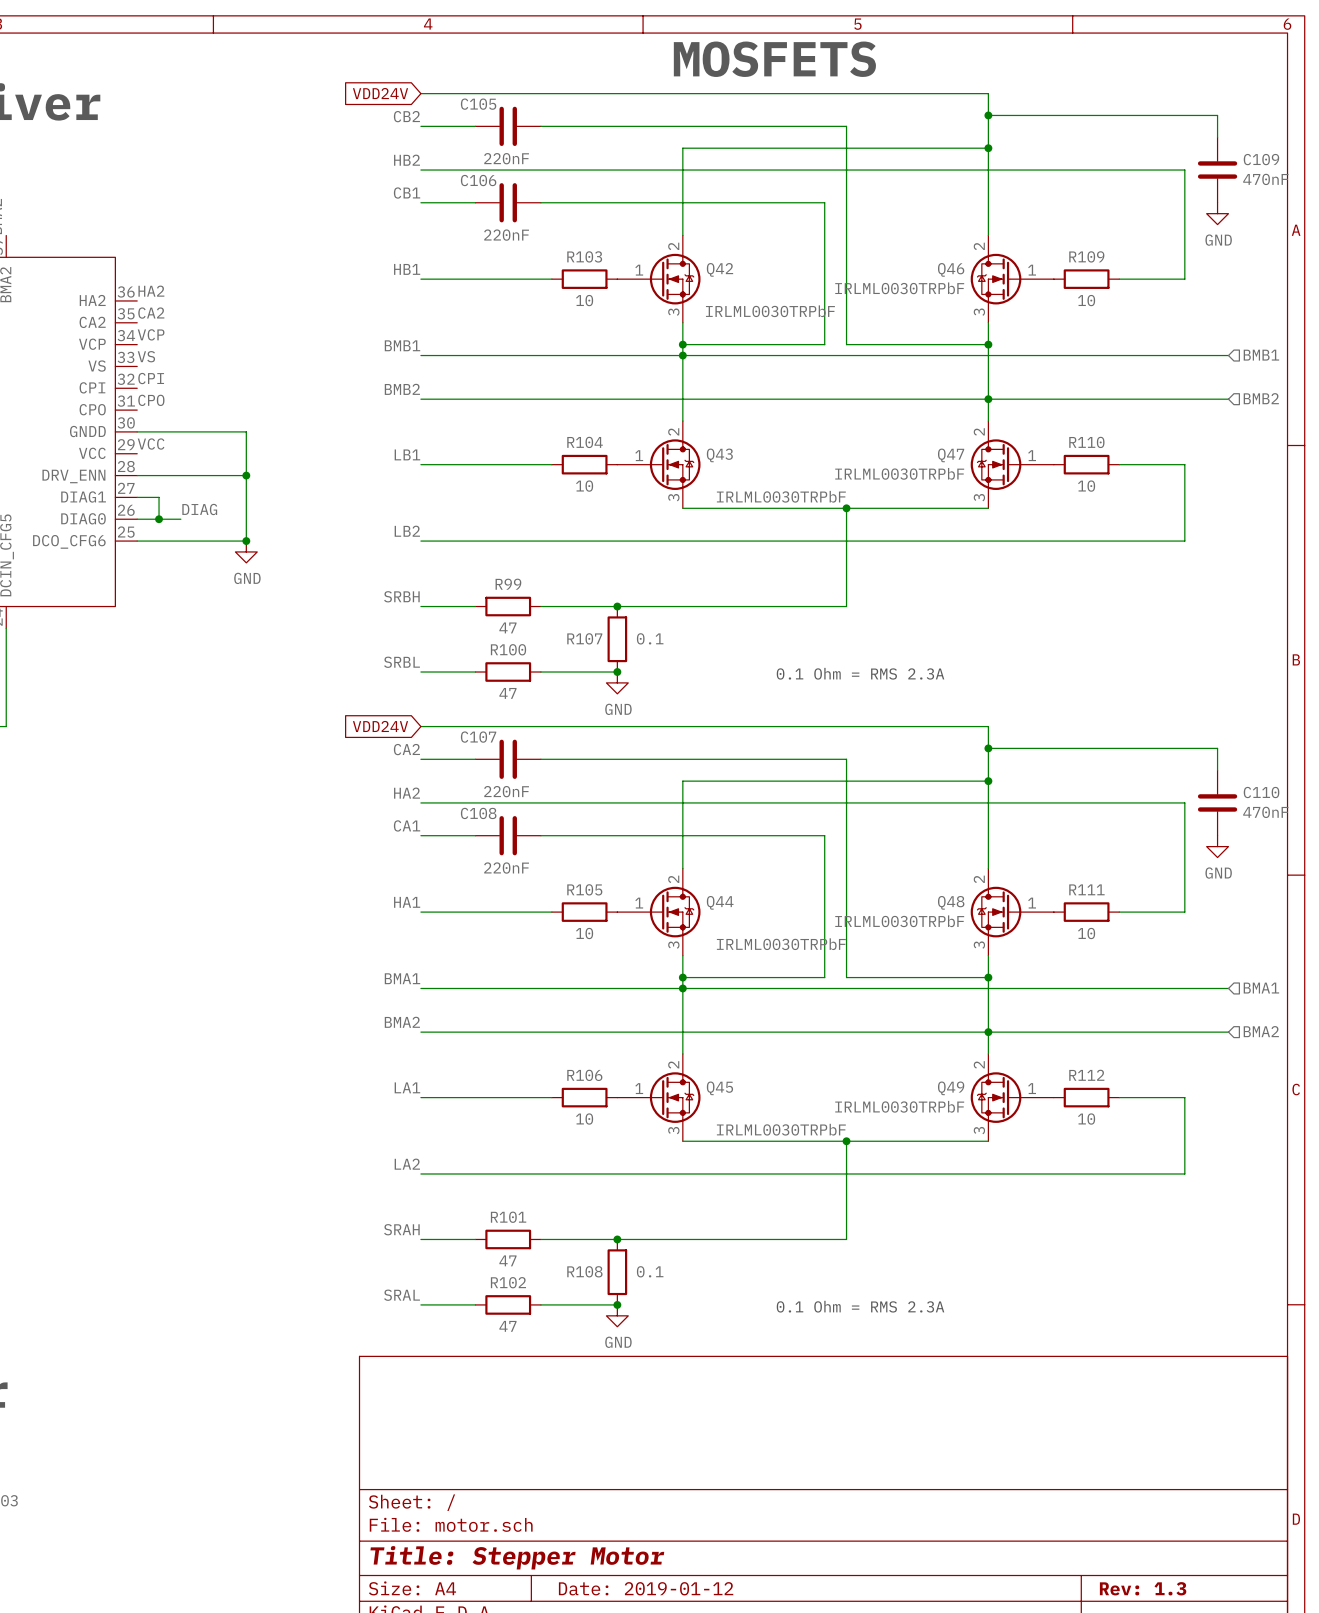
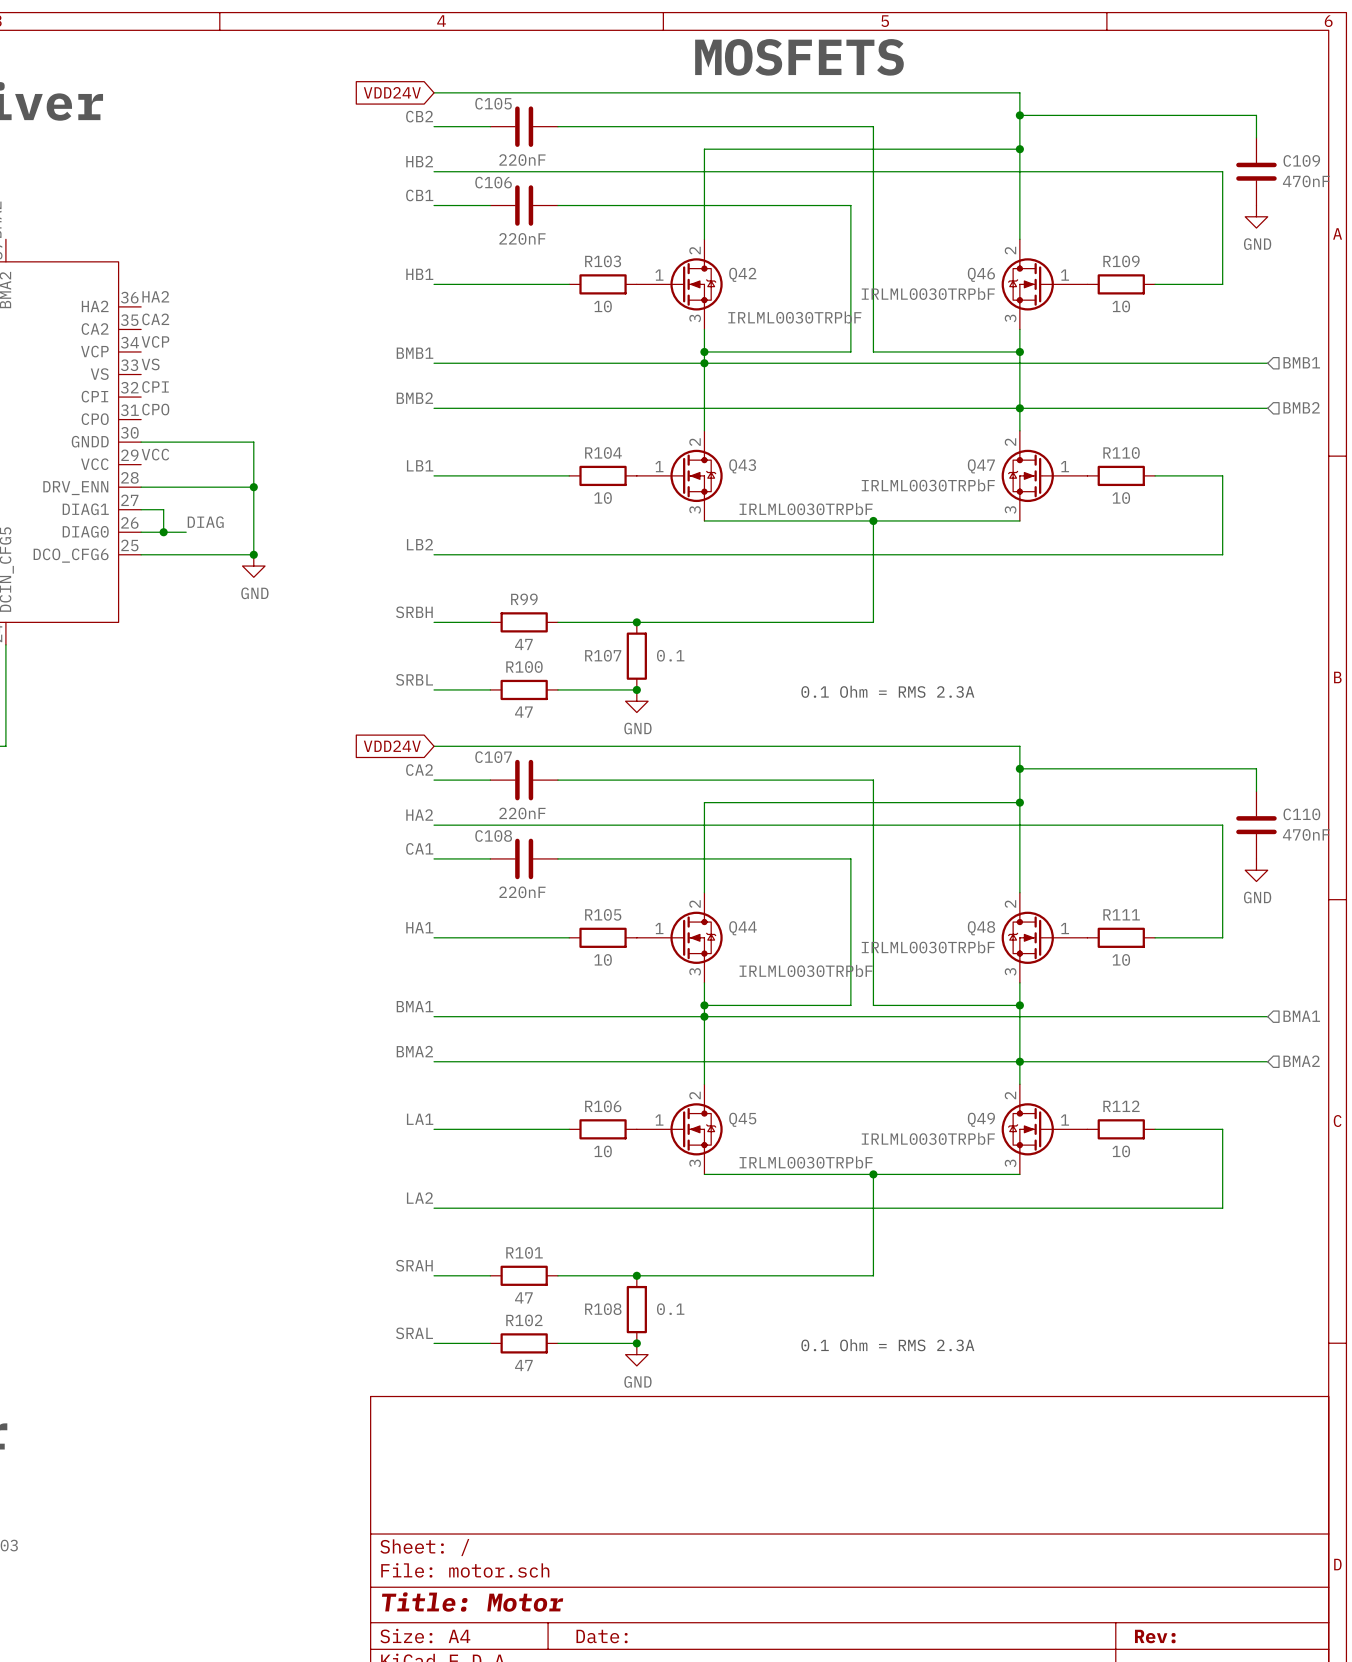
title block: Title: Stepper Motor (517, 1557) -> Title: Motor (472, 1602)
title block: Date: 2019-01-12 (646, 1588) -> Date: (602, 1636)
title block: Rev: 1.3 (1143, 1588) -> Rev: (1155, 1636)

